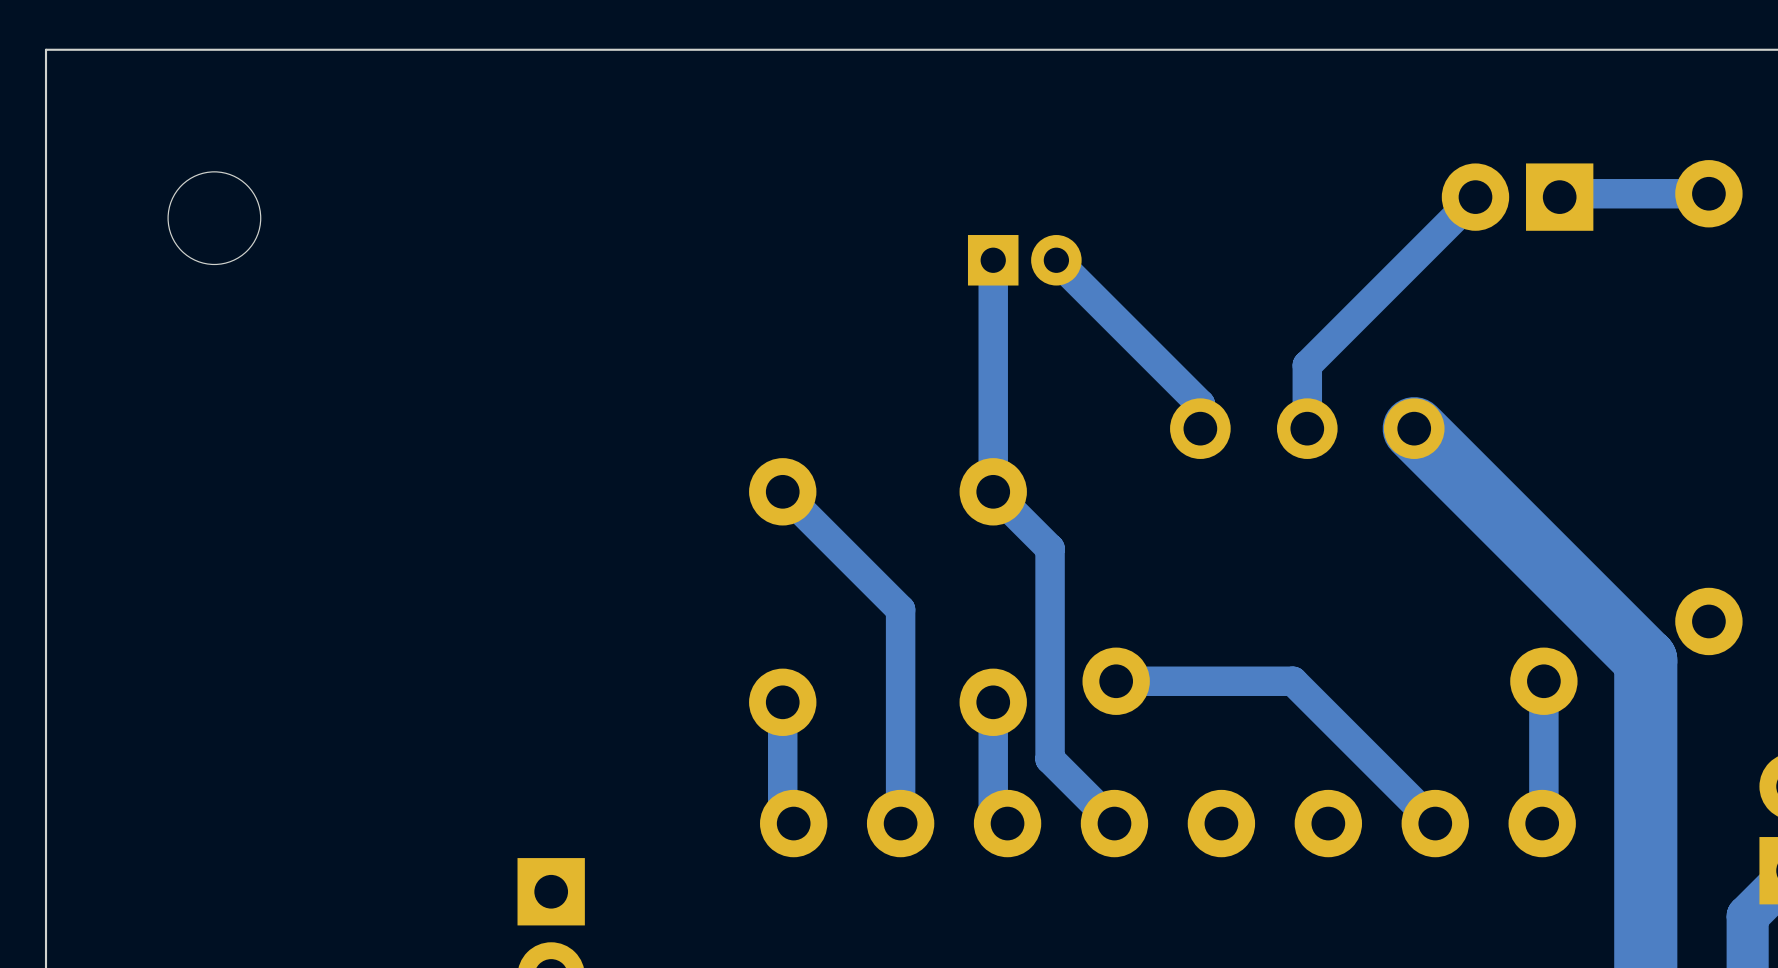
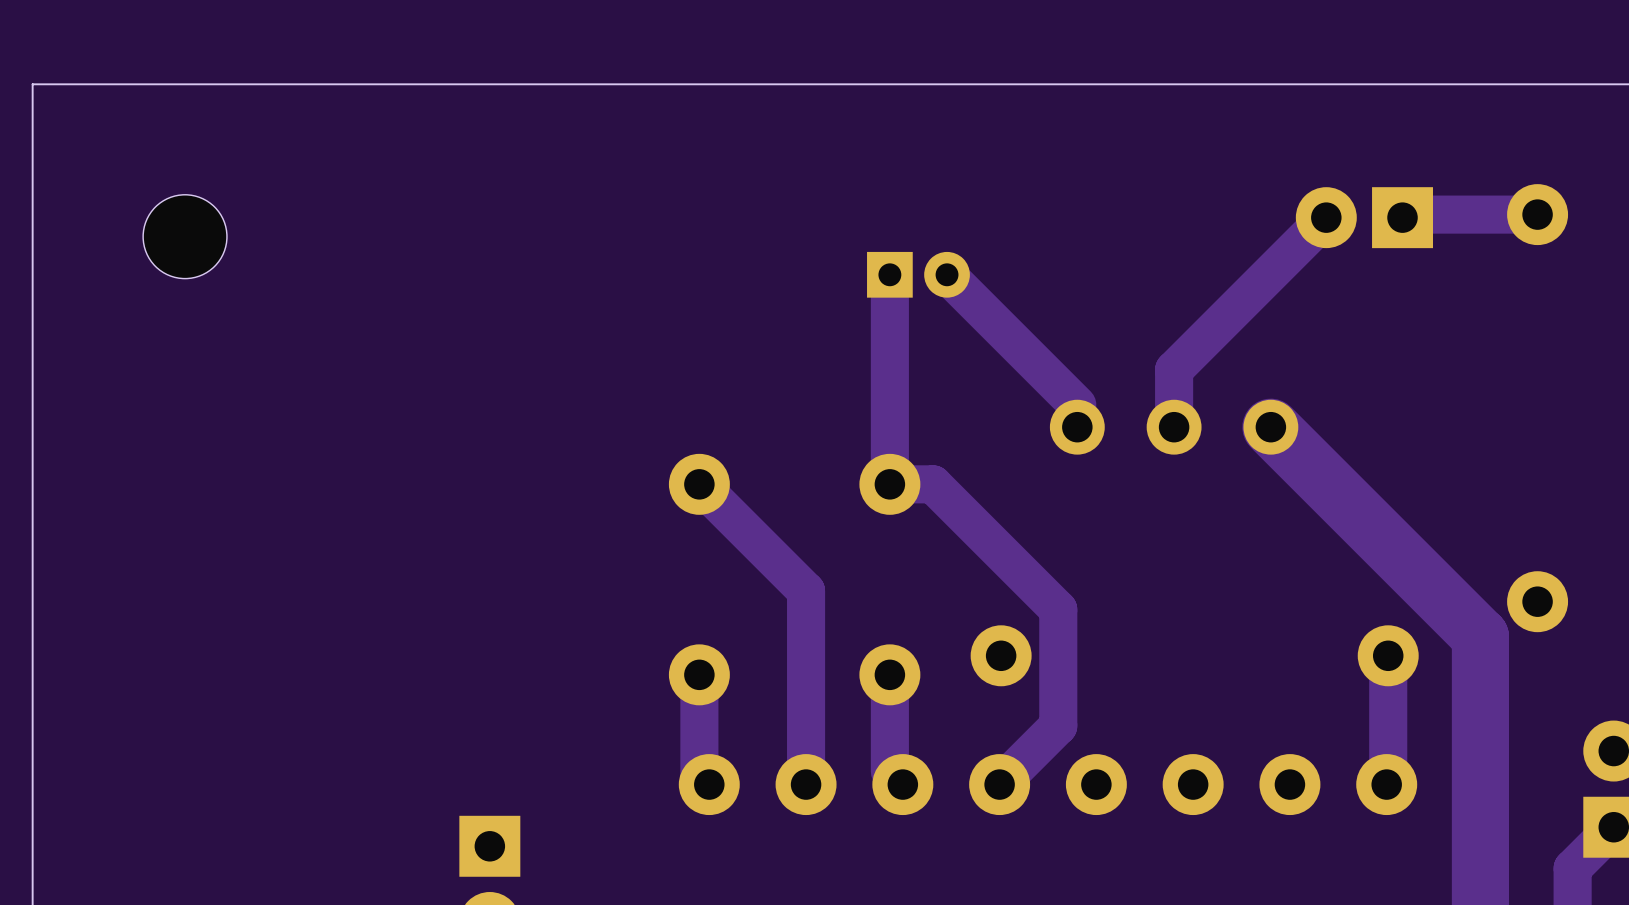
track width: thin (1708, 193) (1563, 193) -> thick (1537, 214) (1405, 214)
track width: thin (1475, 197) (1307, 365) (1307, 428) -> thick (1326, 217) (1174, 369) (1174, 427)
track width: thin (993, 260) (993, 491) -> thick (889, 274) (889, 484)
track width: thin (1056, 260) (1200, 404) -> thick (947, 274) (1077, 405)
track width: thin (782, 491) (900, 609) (900, 823) -> thick (699, 484) (806, 591) (806, 784)
track: (993, 491) (1050, 548) (1050, 759) (1114, 823) -> (889, 484) (932, 484) (1058, 609) (1058, 725) (999, 784)
track: (1116, 681) (1292, 681) (1435, 823) -> none
track width: thin (1543, 681) (1543, 821) -> thick (1388, 655) (1388, 783)
track width: thin (782, 702) (782, 812) -> thick (699, 674) (699, 774)
track width: thin (993, 702) (993, 809) -> thick (889, 674) (889, 771)

